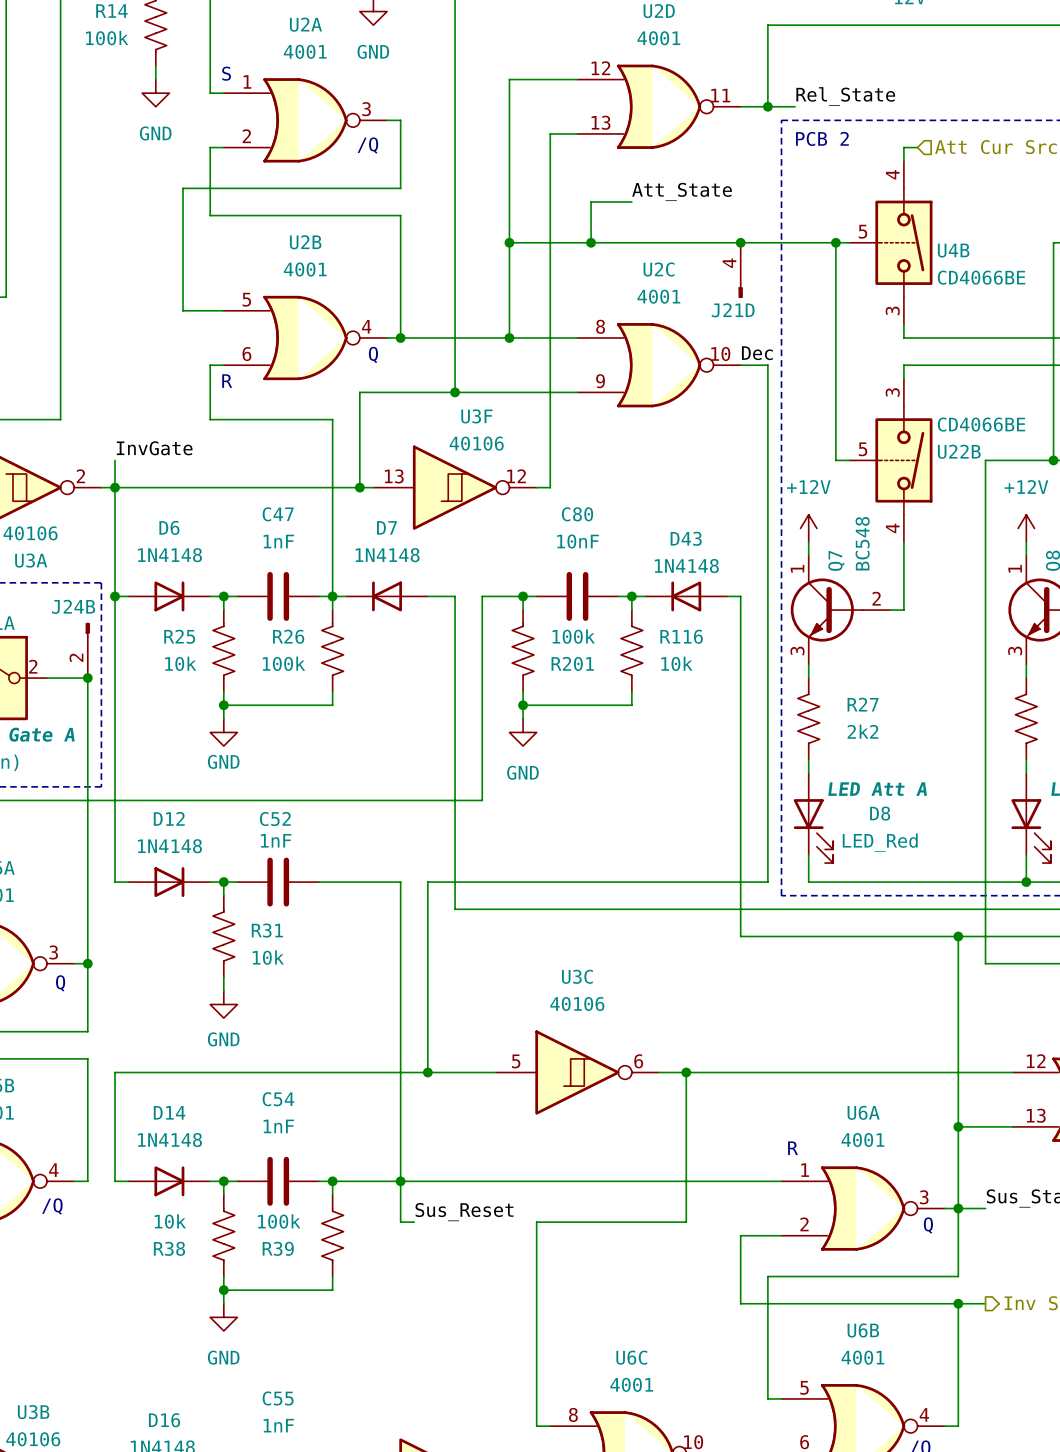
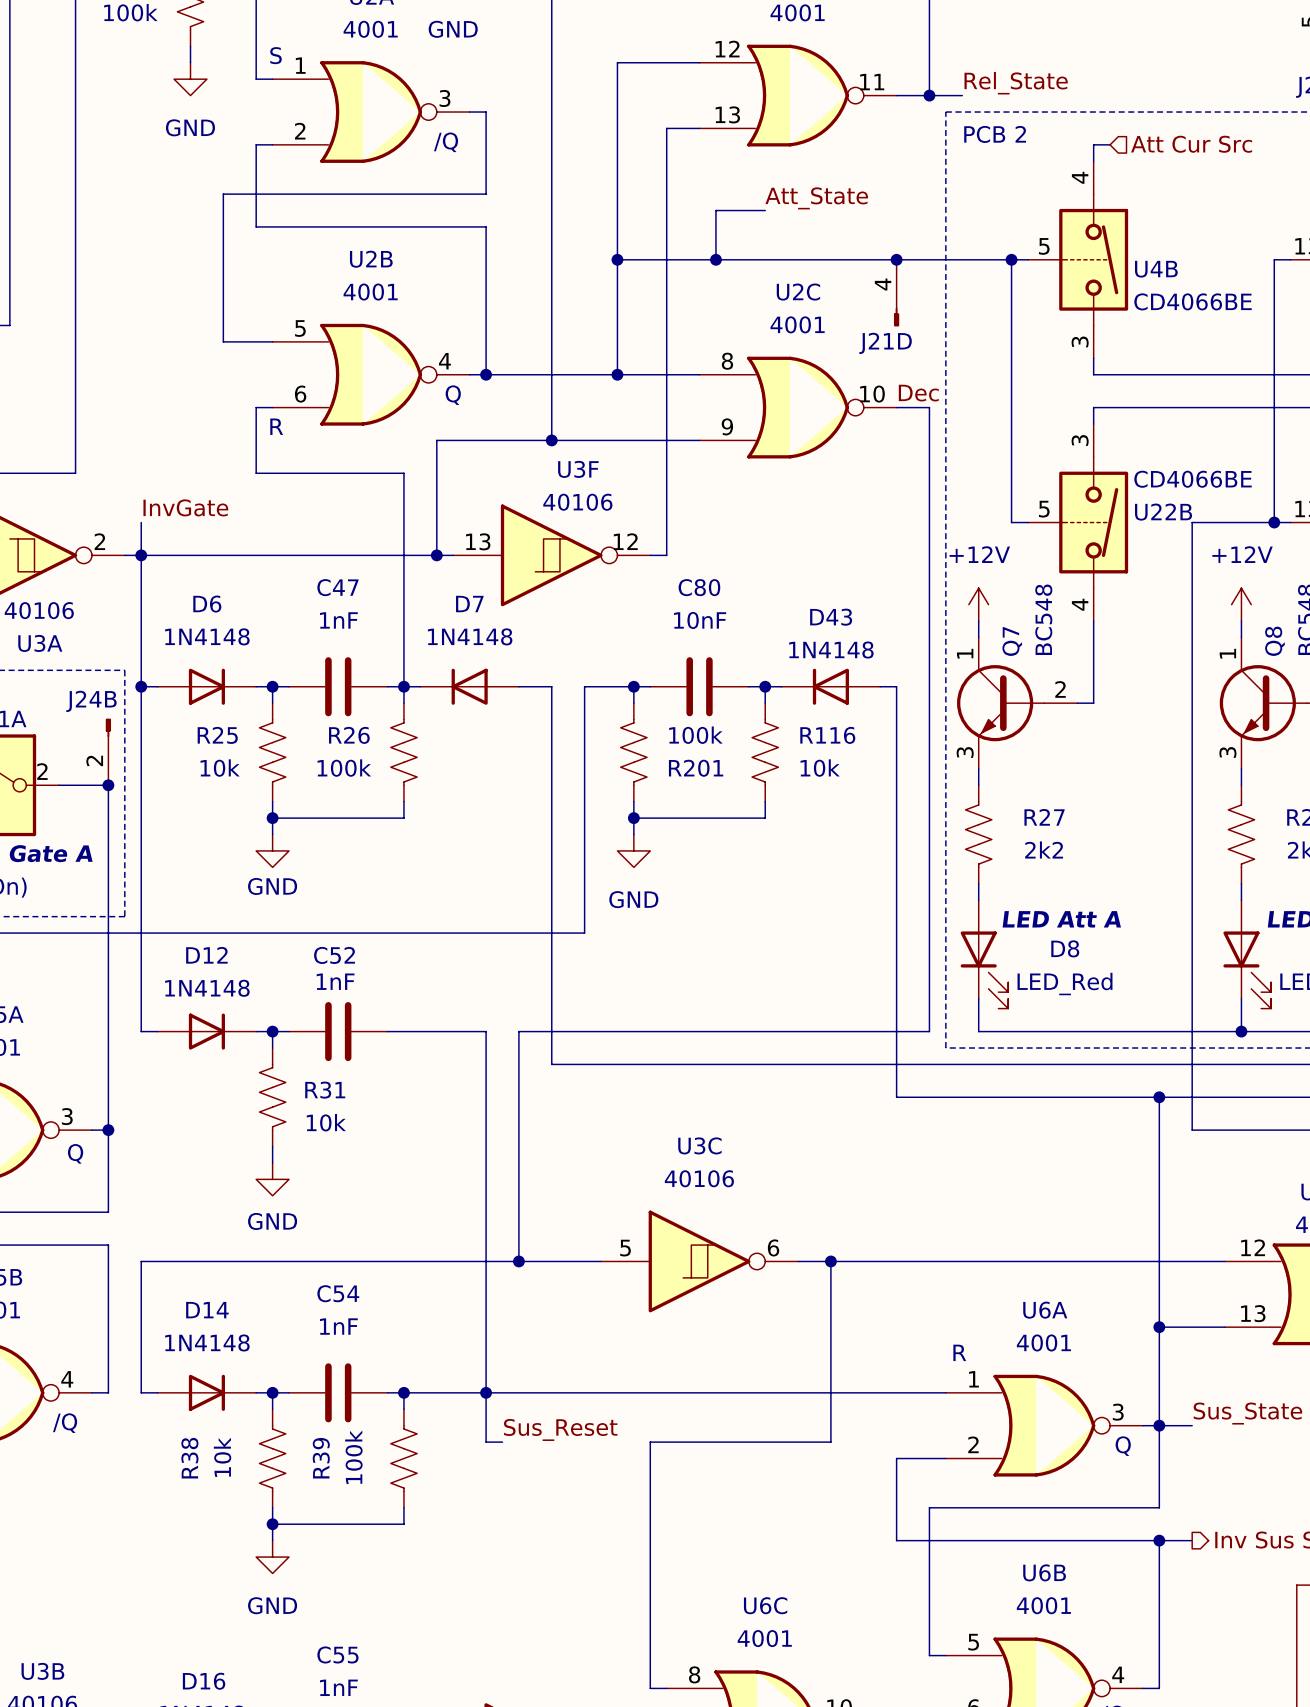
R38 value rotation: 0° (170, 1221) -> 90° counterclockwise (222, 1457)
R39 value rotation: 0° (279, 1221) -> 90° counterclockwise (353, 1457)
R38 name rotation: 0° (169, 1248) -> 90° counterclockwise (189, 1458)
R39 name rotation: 0° (278, 1248) -> 90° counterclockwise (321, 1458)

